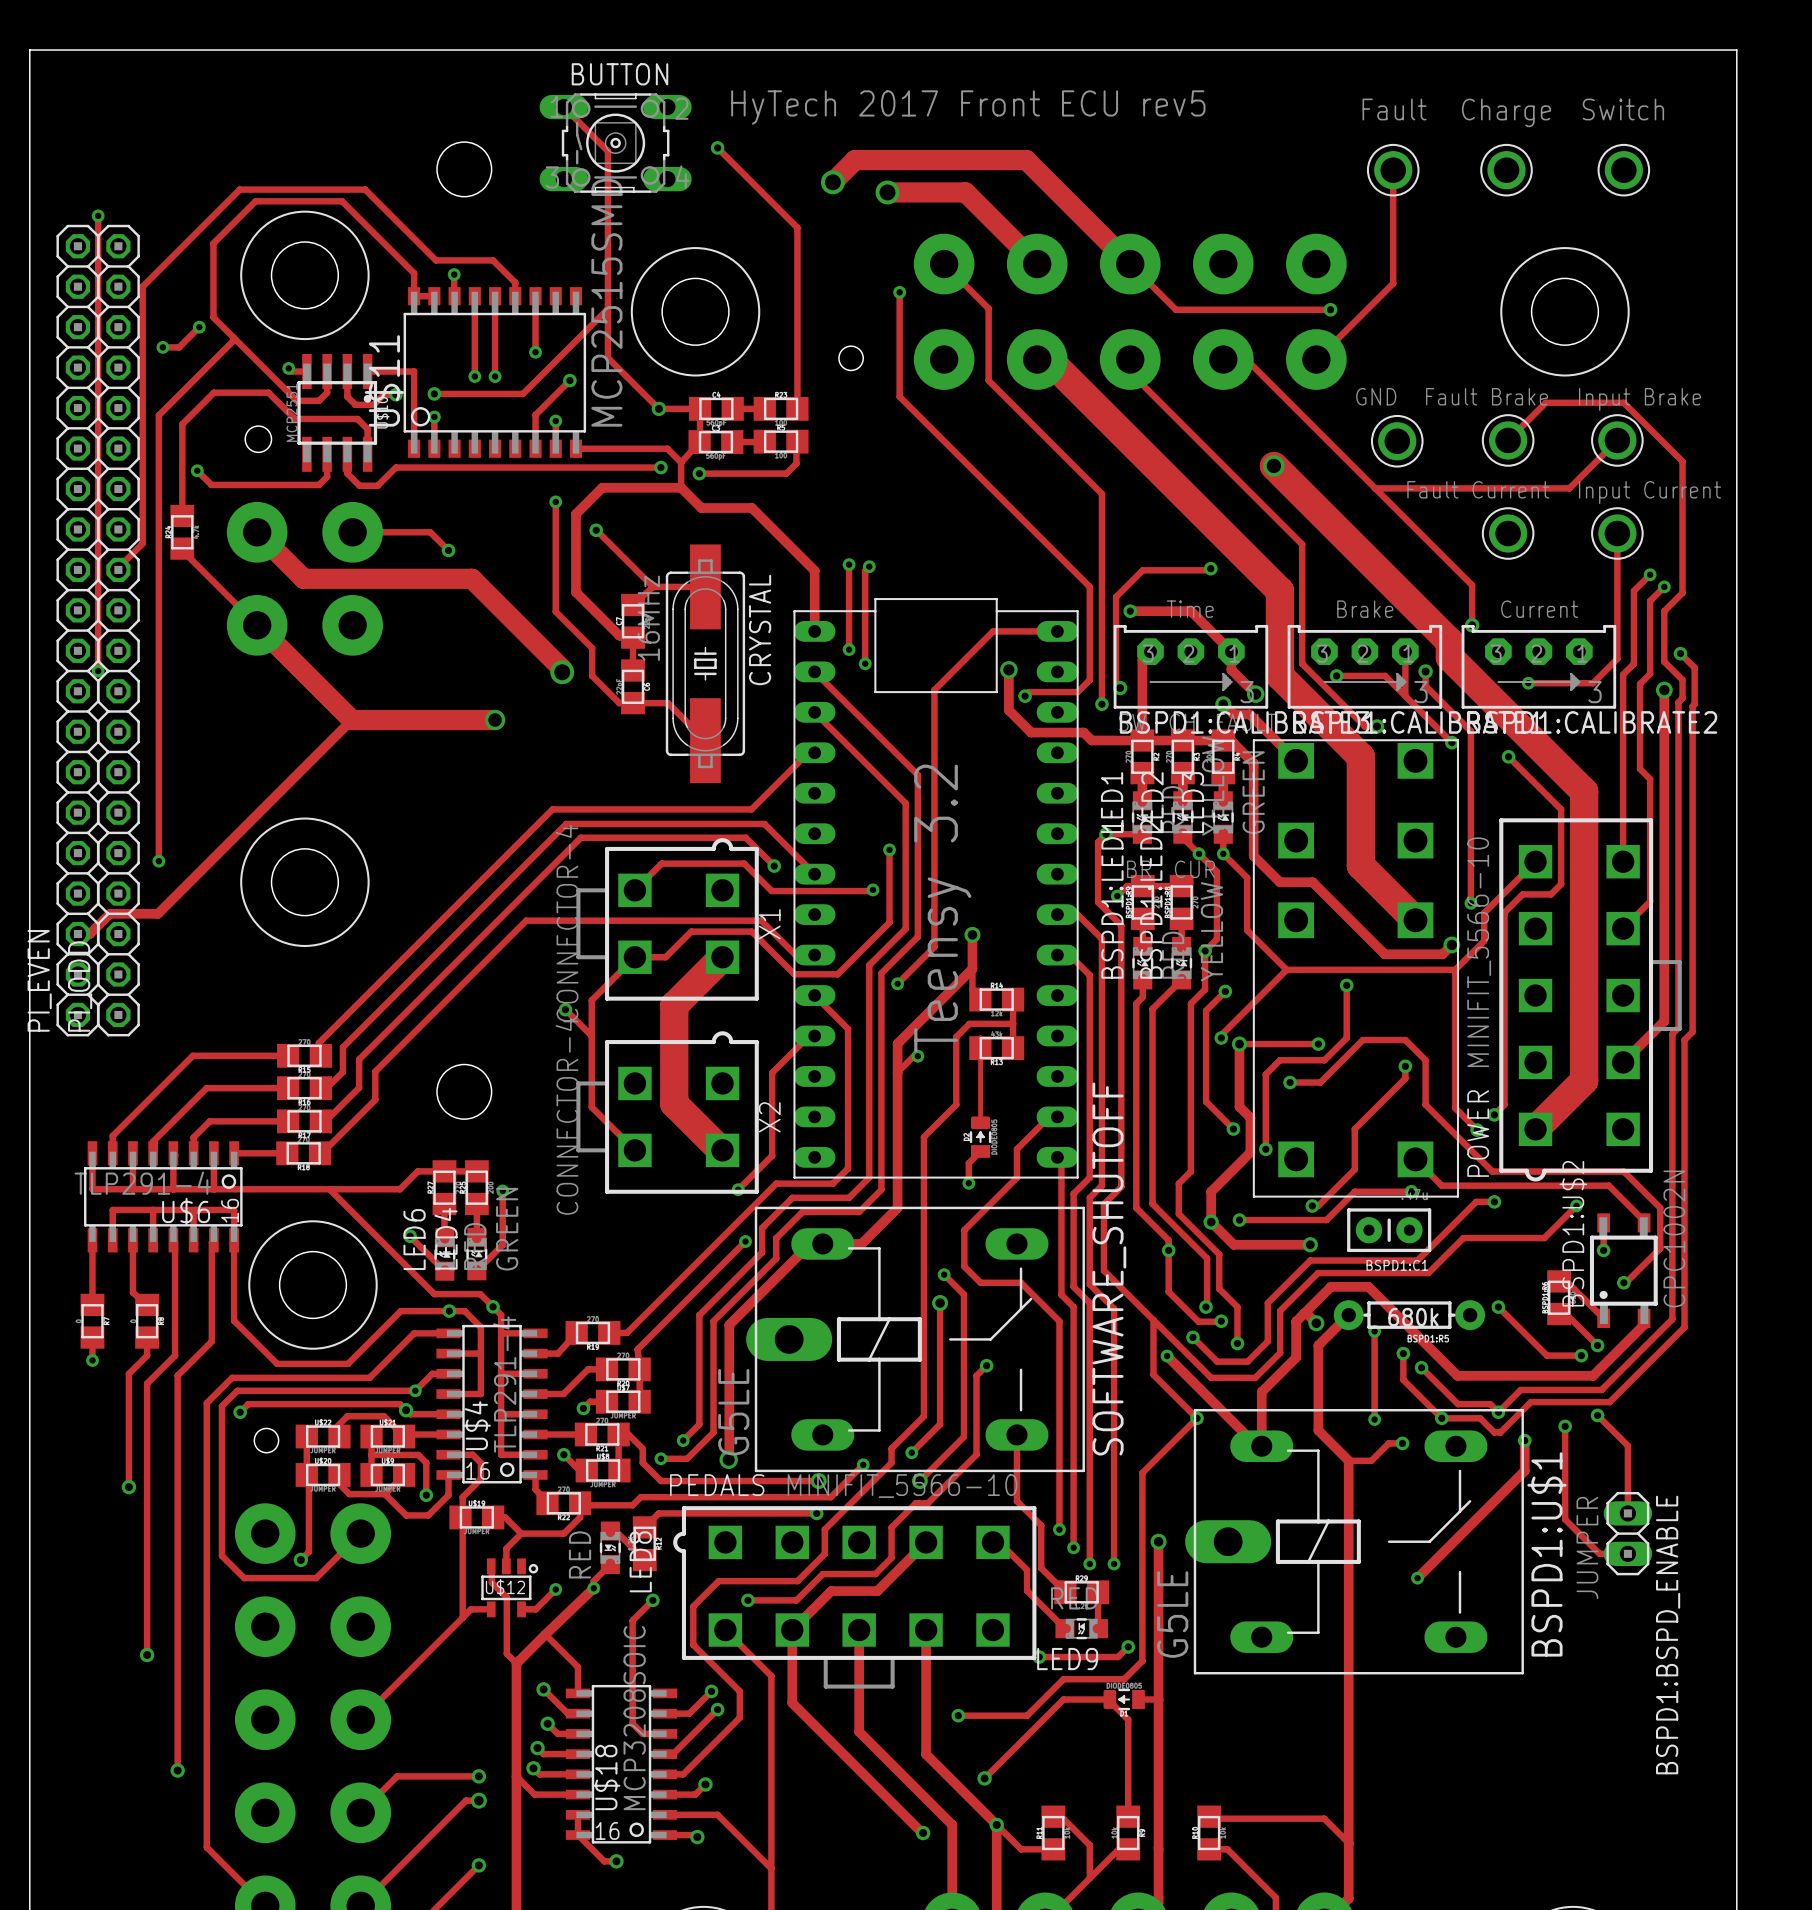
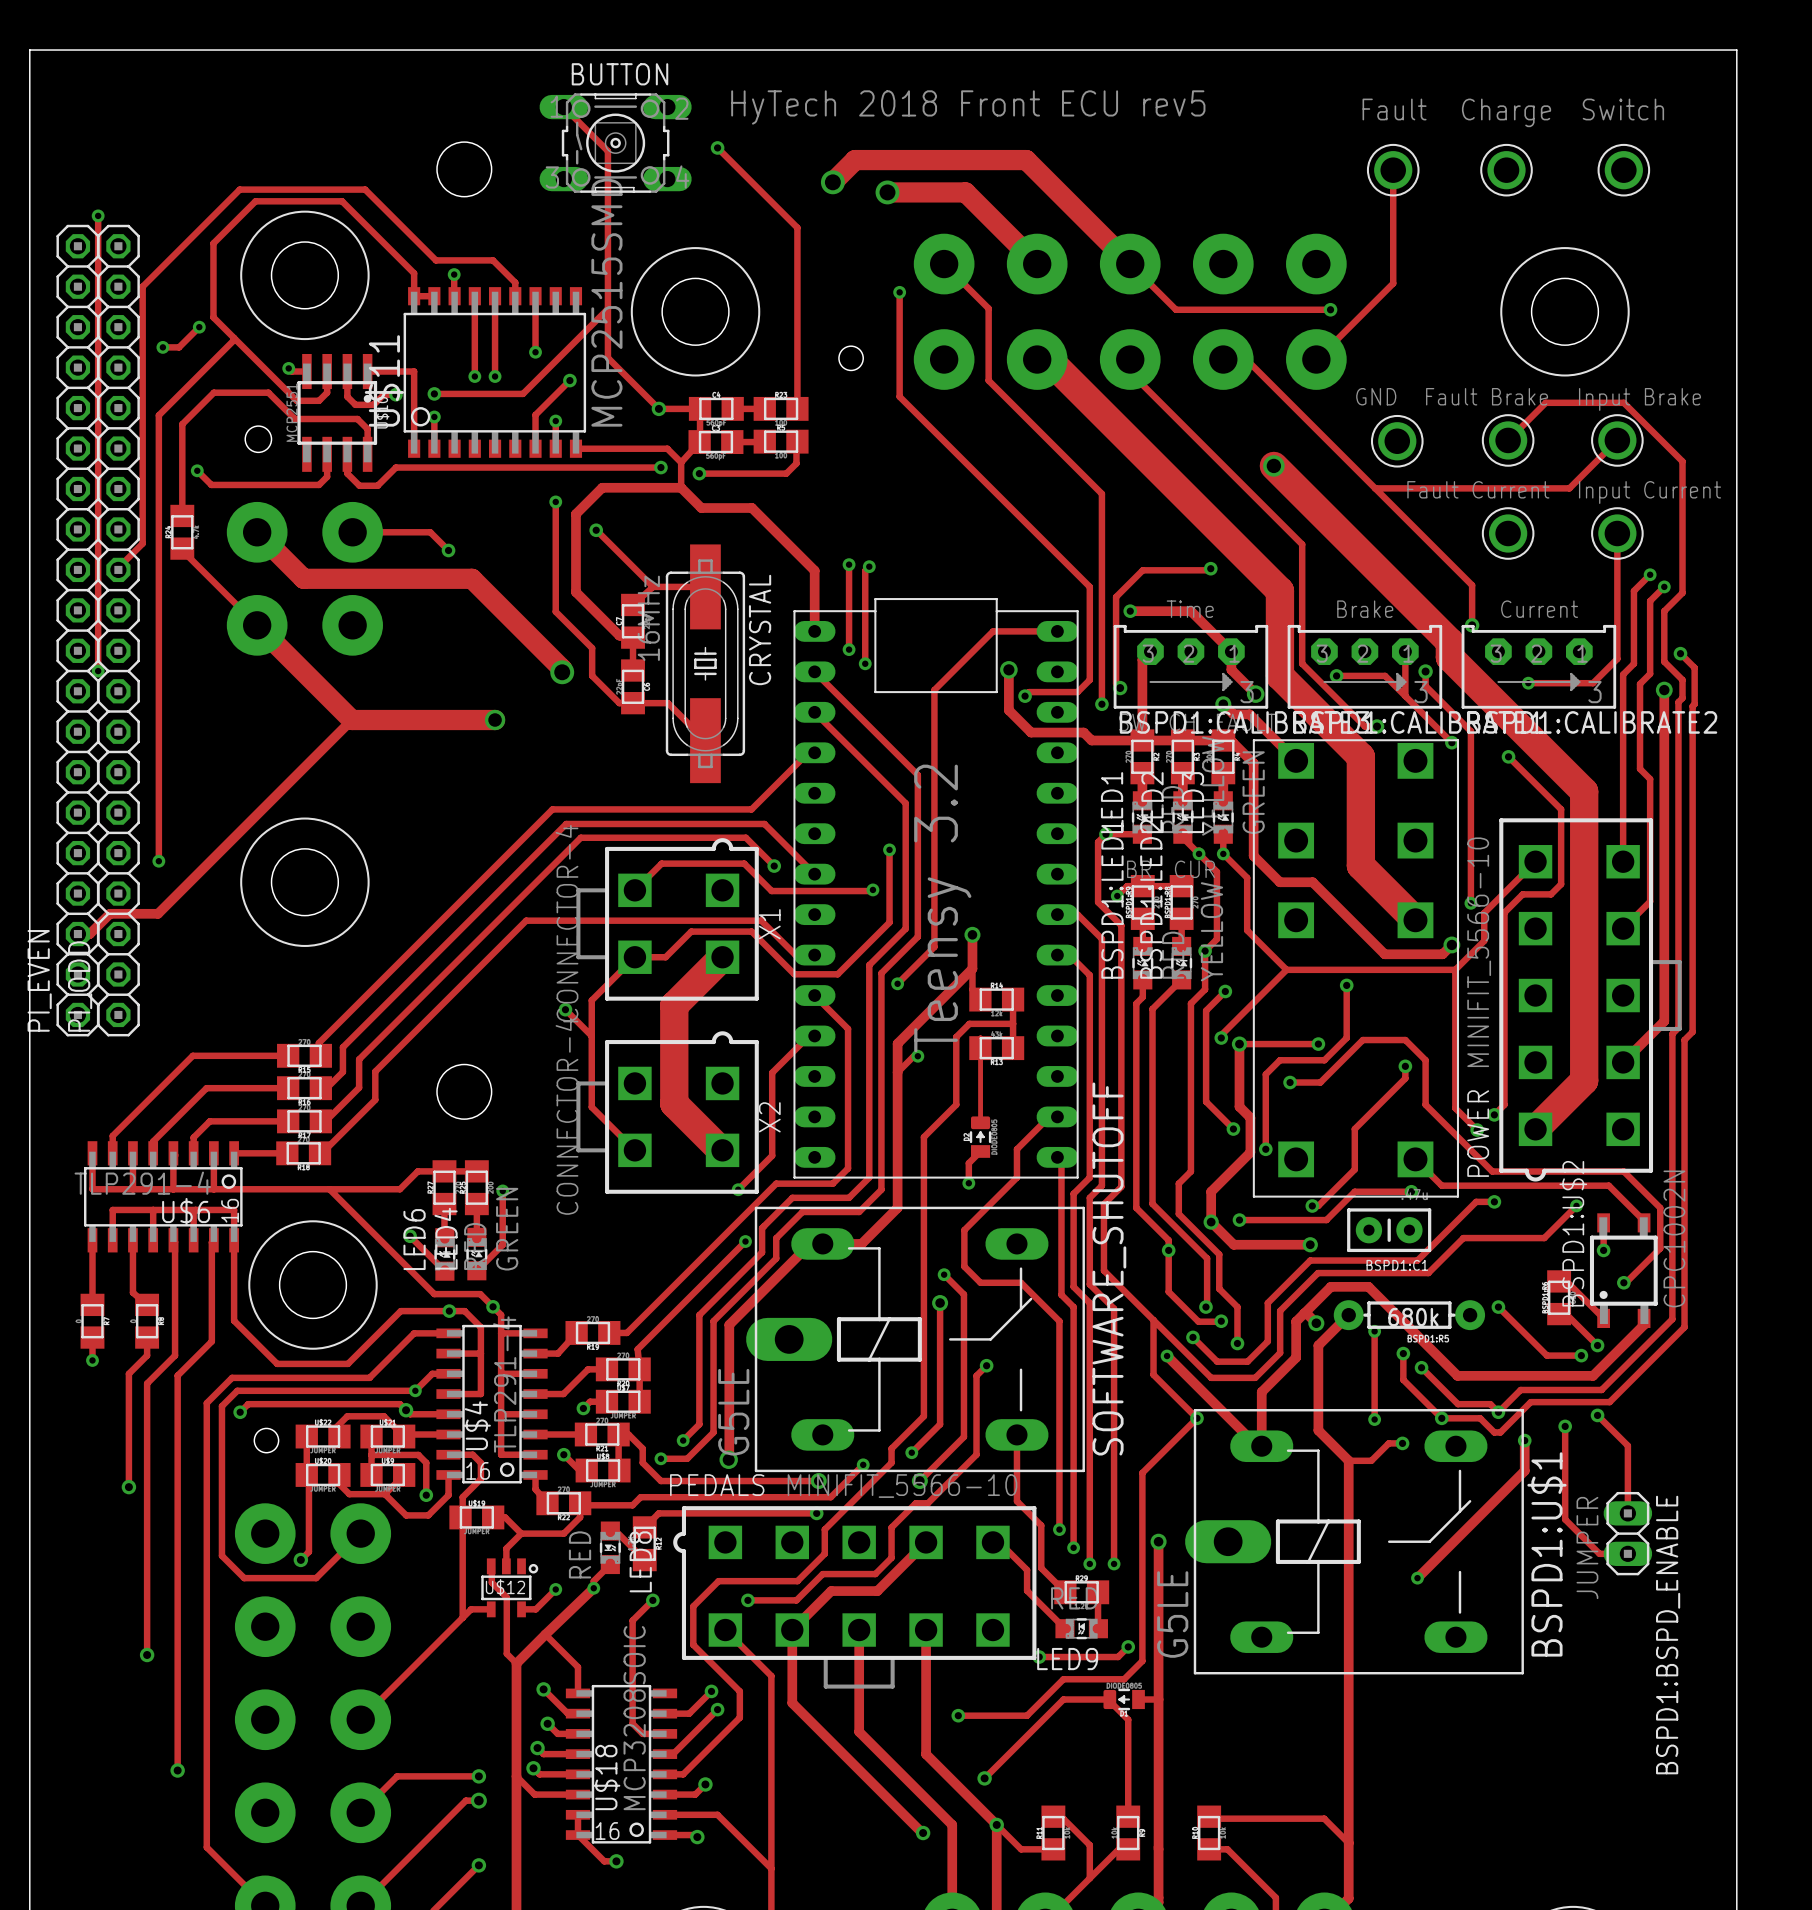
text: HyTech 2017 Front ECU rev5 (968, 107) -> HyTech 2018 Front ECU rev5 (968, 107)

